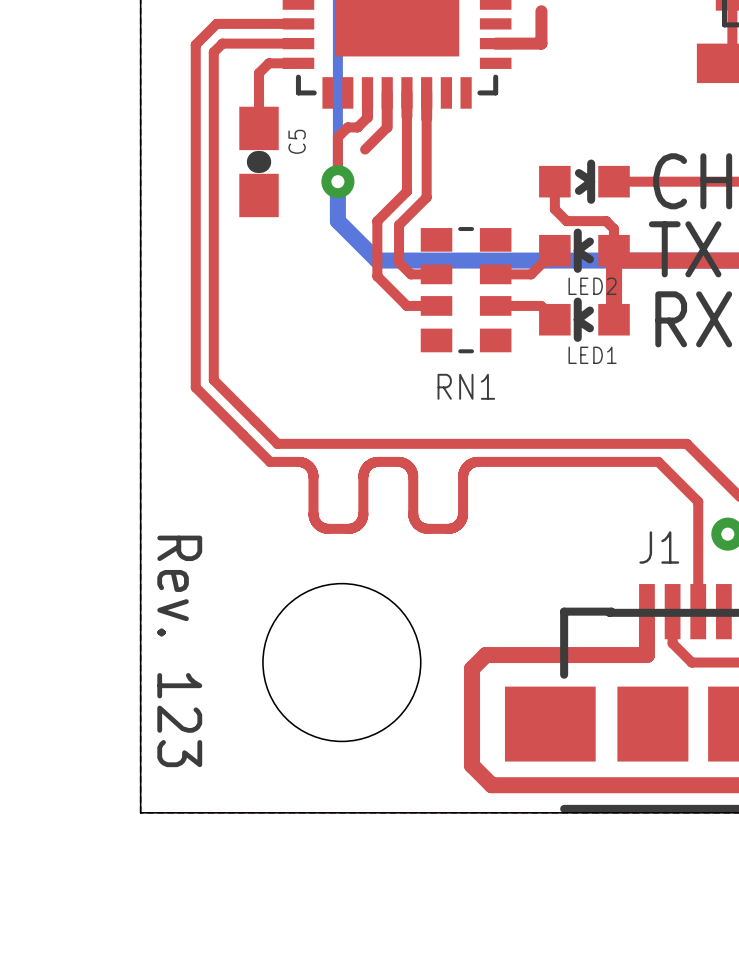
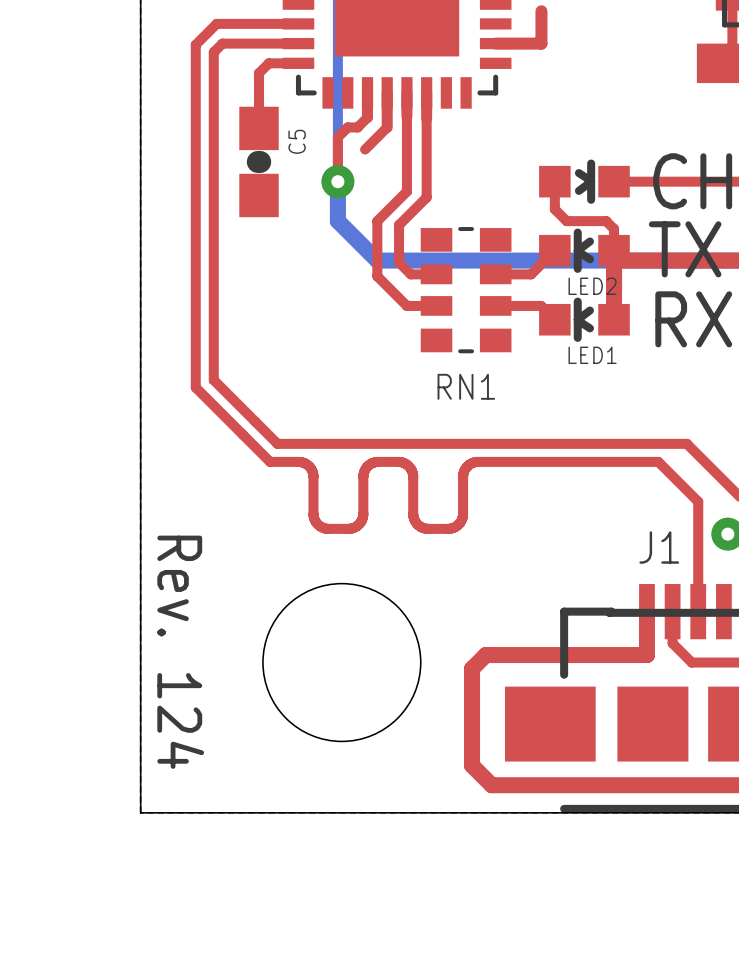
text: Rev. 123 (179, 651) -> Rev. 124 (180, 652)

